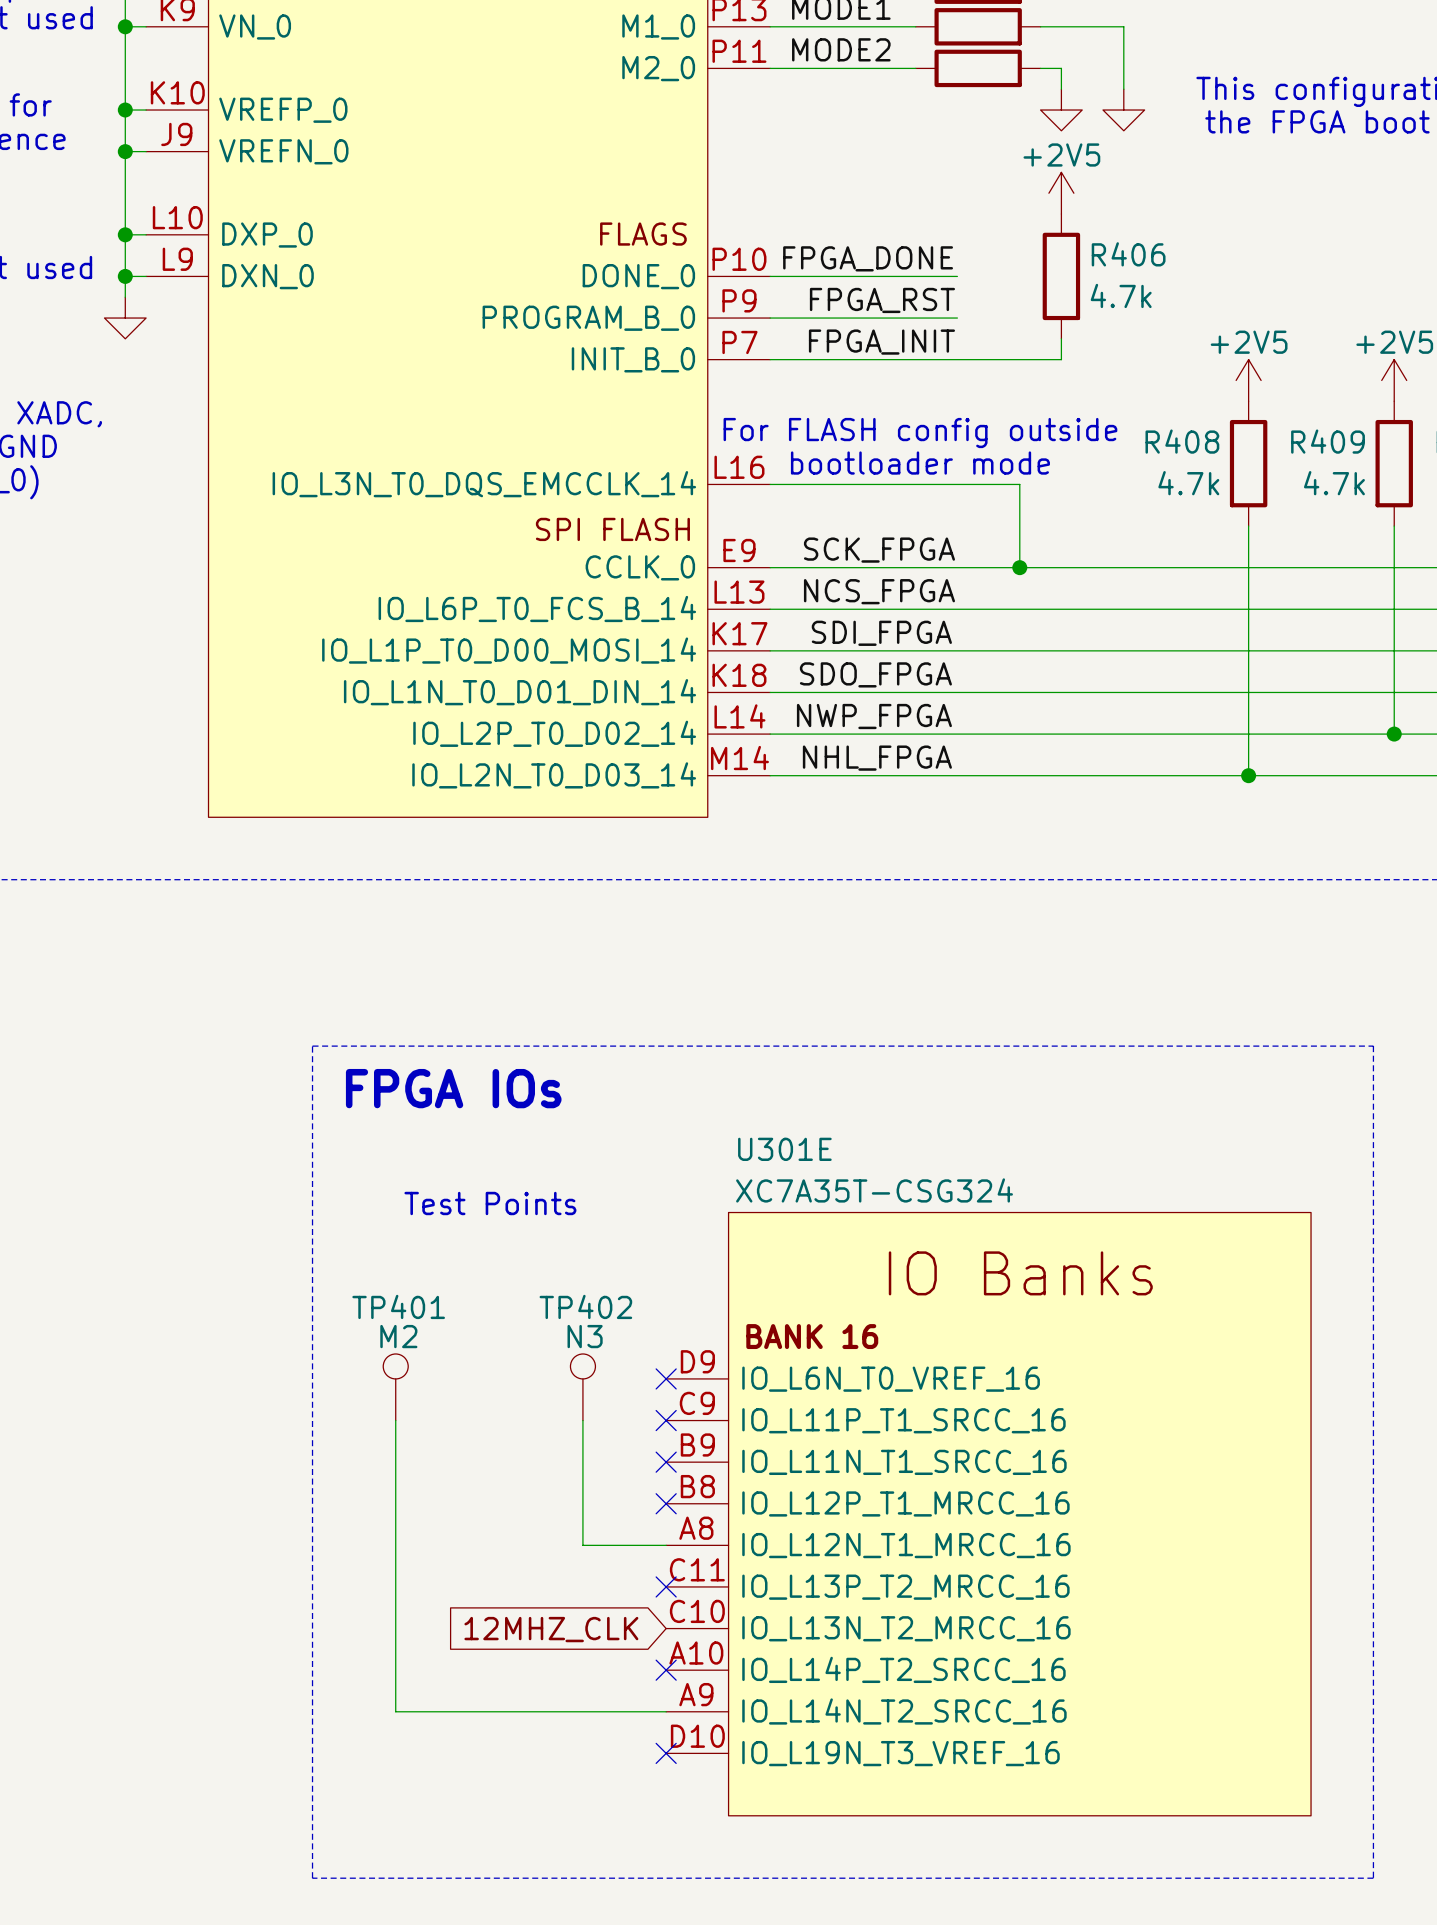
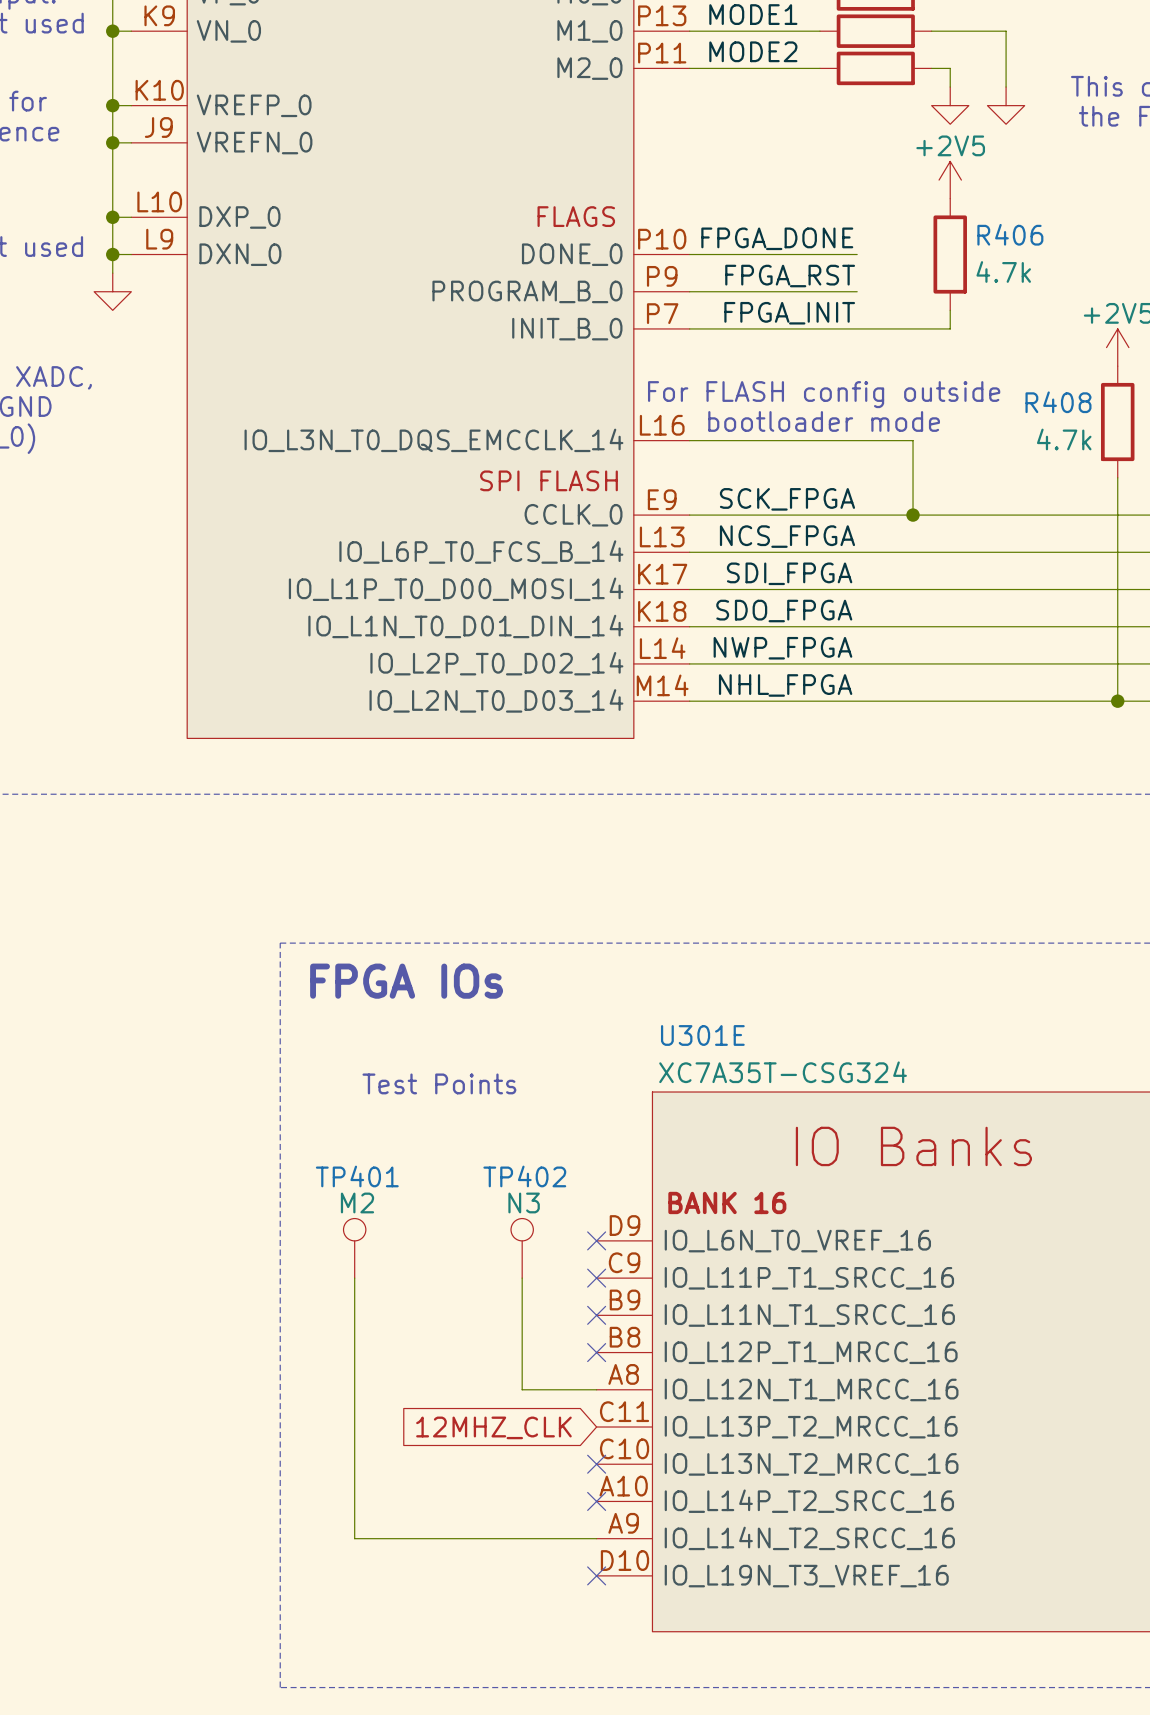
no-connect mark position: (666, 1586) -> (596, 1464)
global label position: 12MHZ_CLK (551, 1629) -> 12MHZ_CLK (493, 1427)

